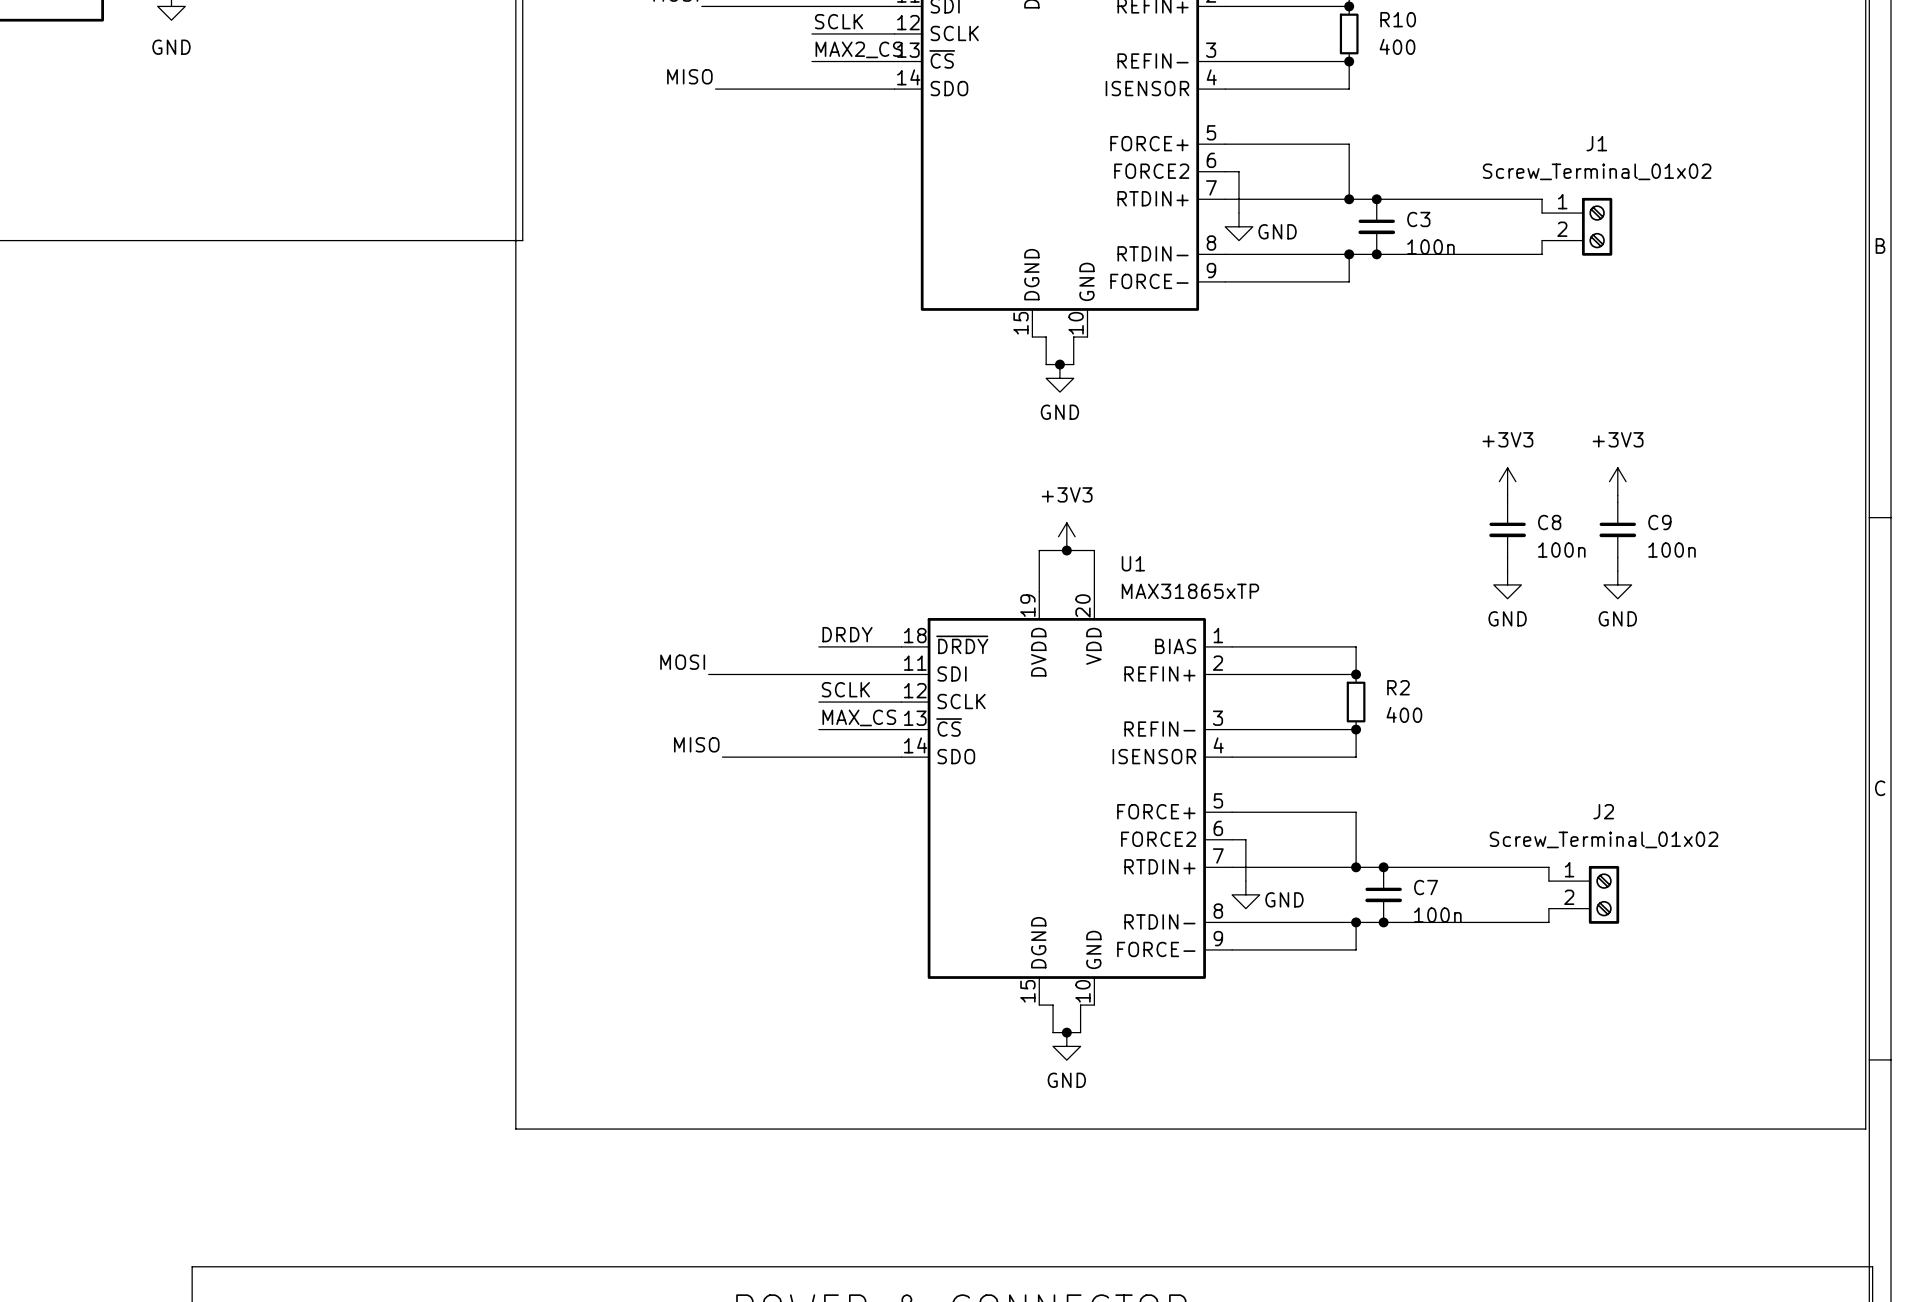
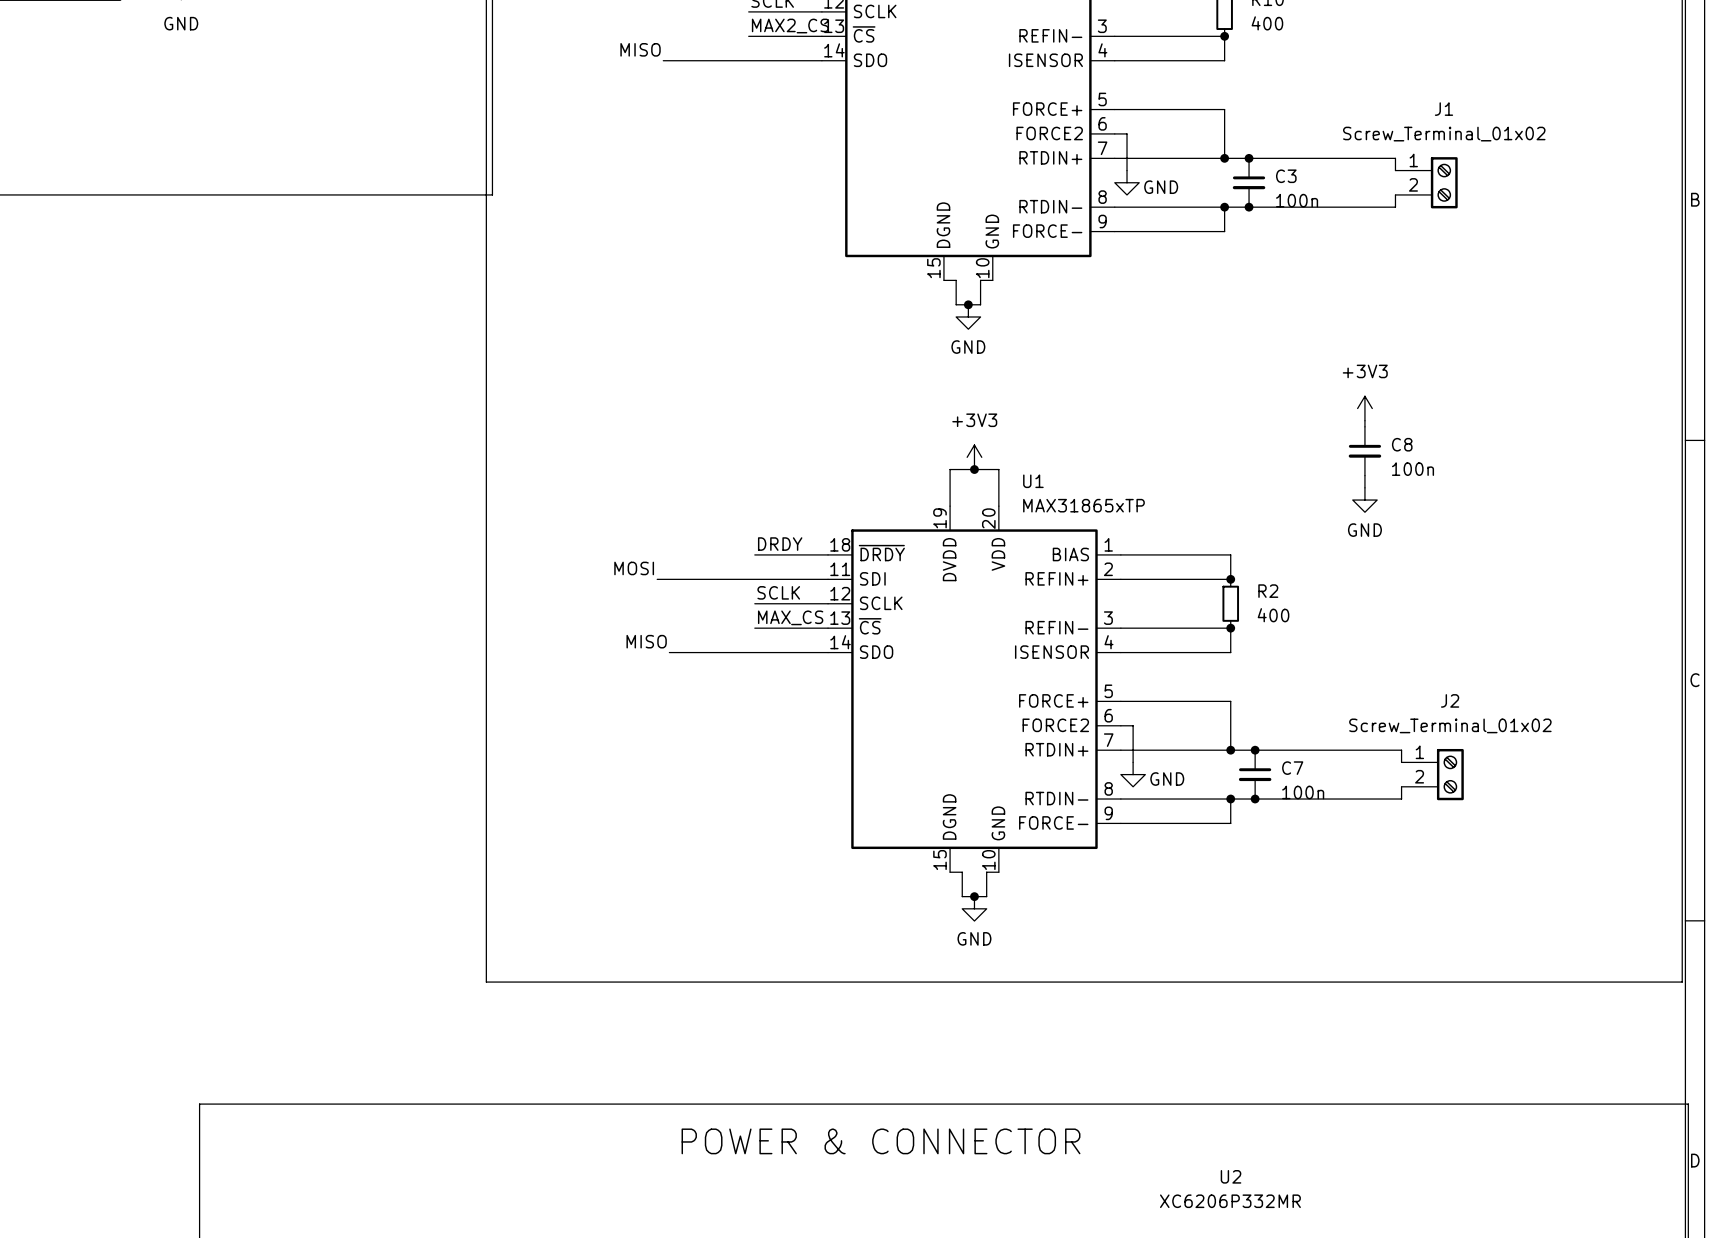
power symbol: +3V3 (1617, 481) -> none
wire: (1617, 495) (1617, 502) -> none
C9: 100n (1617, 529) -> none
wire: (1617, 557) (1617, 571) -> none
power symbol: GND (1617, 584) -> none

